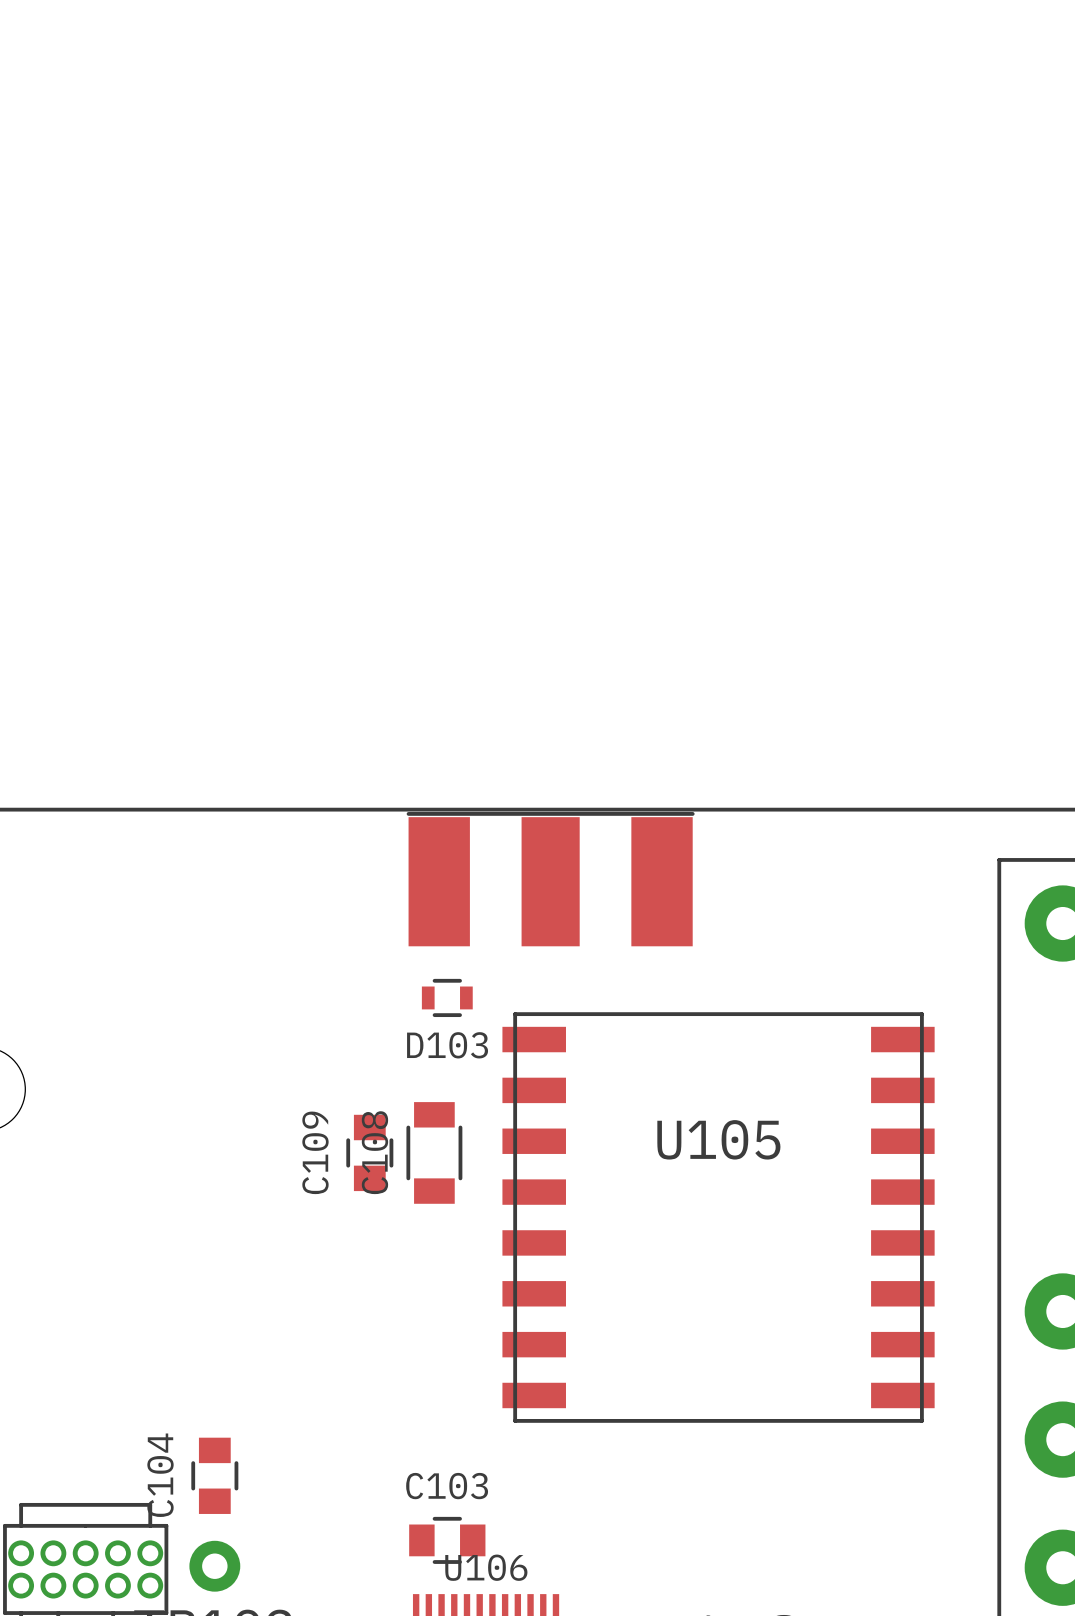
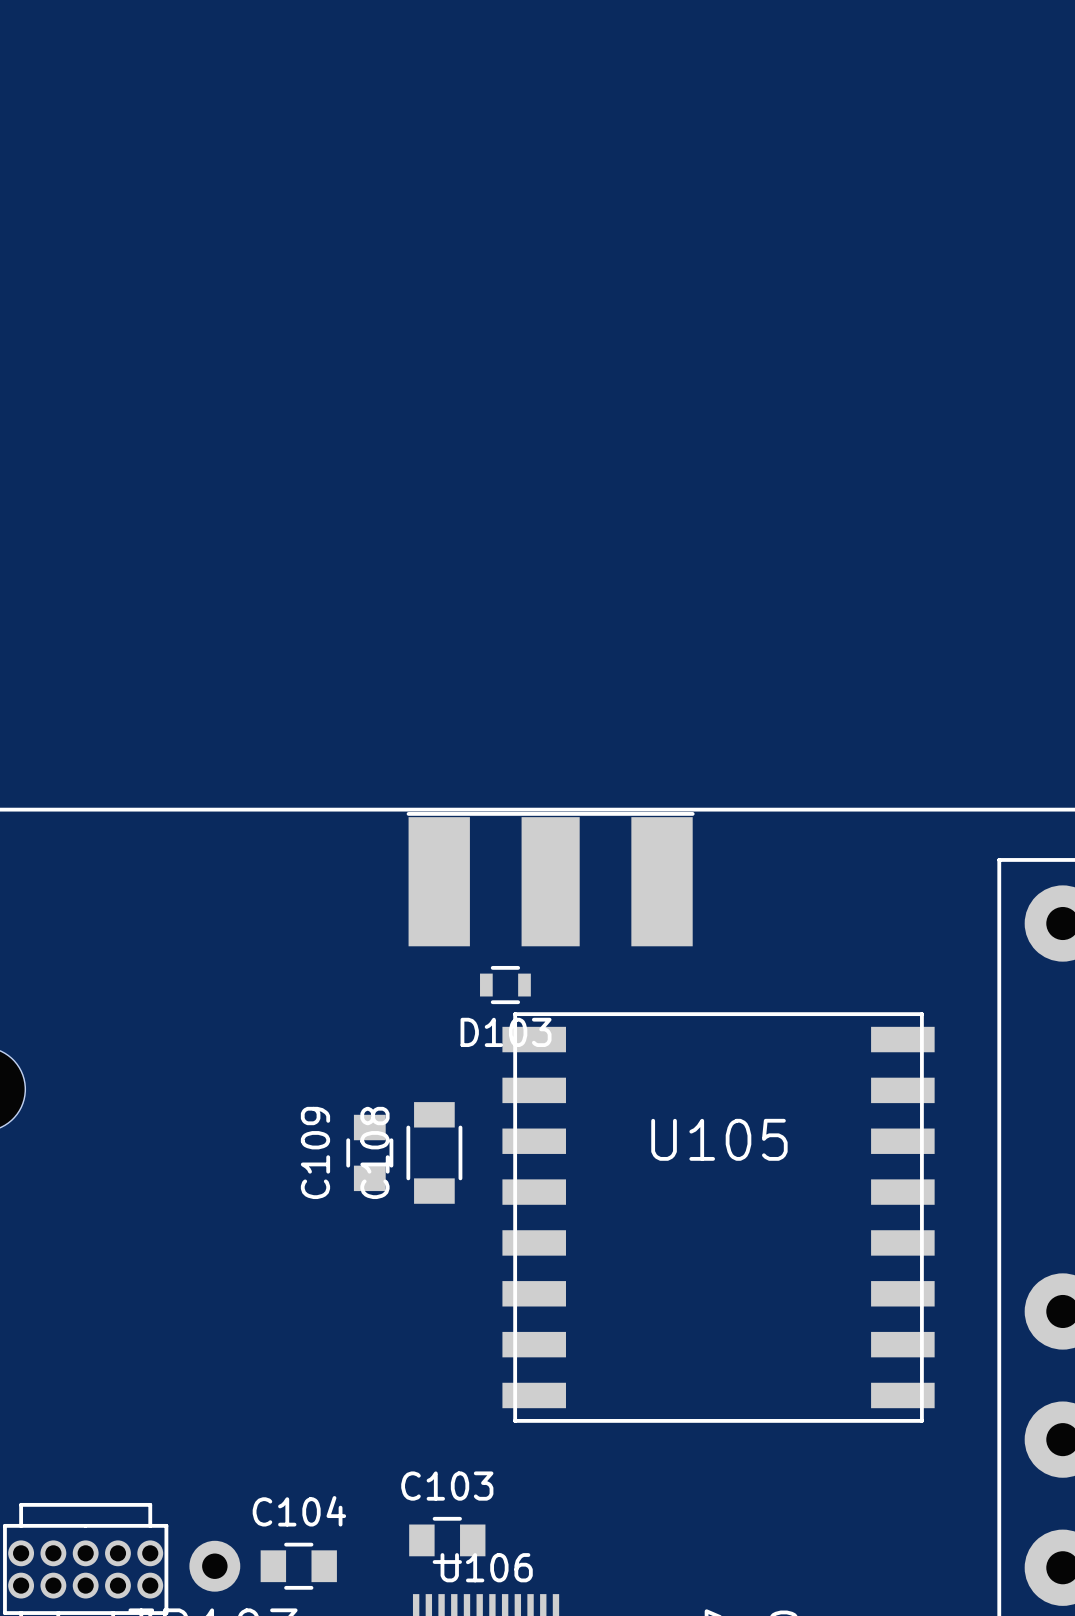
D103 position: (447, 997) -> (505, 985)
C104 rotation: 0° (214, 1475) -> 90° clockwise (298, 1566)
C104 position: (214, 1475) -> (298, 1566)

